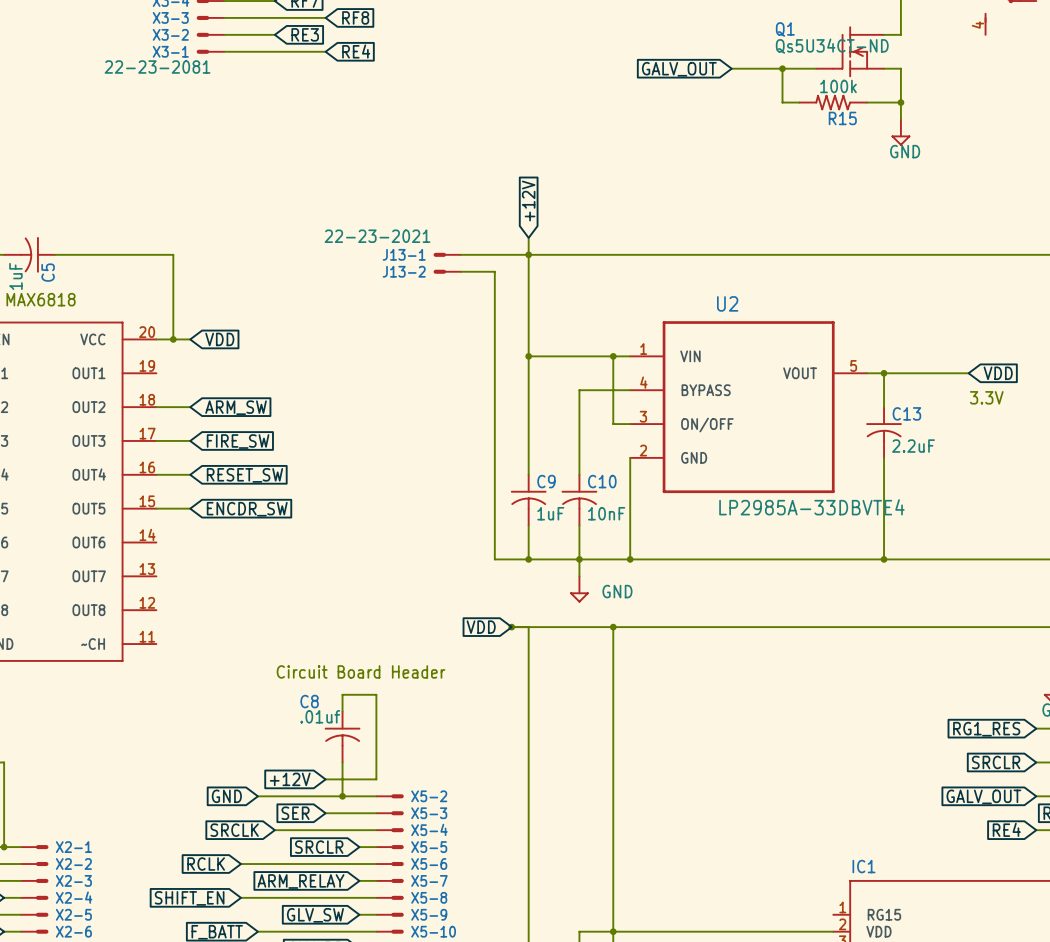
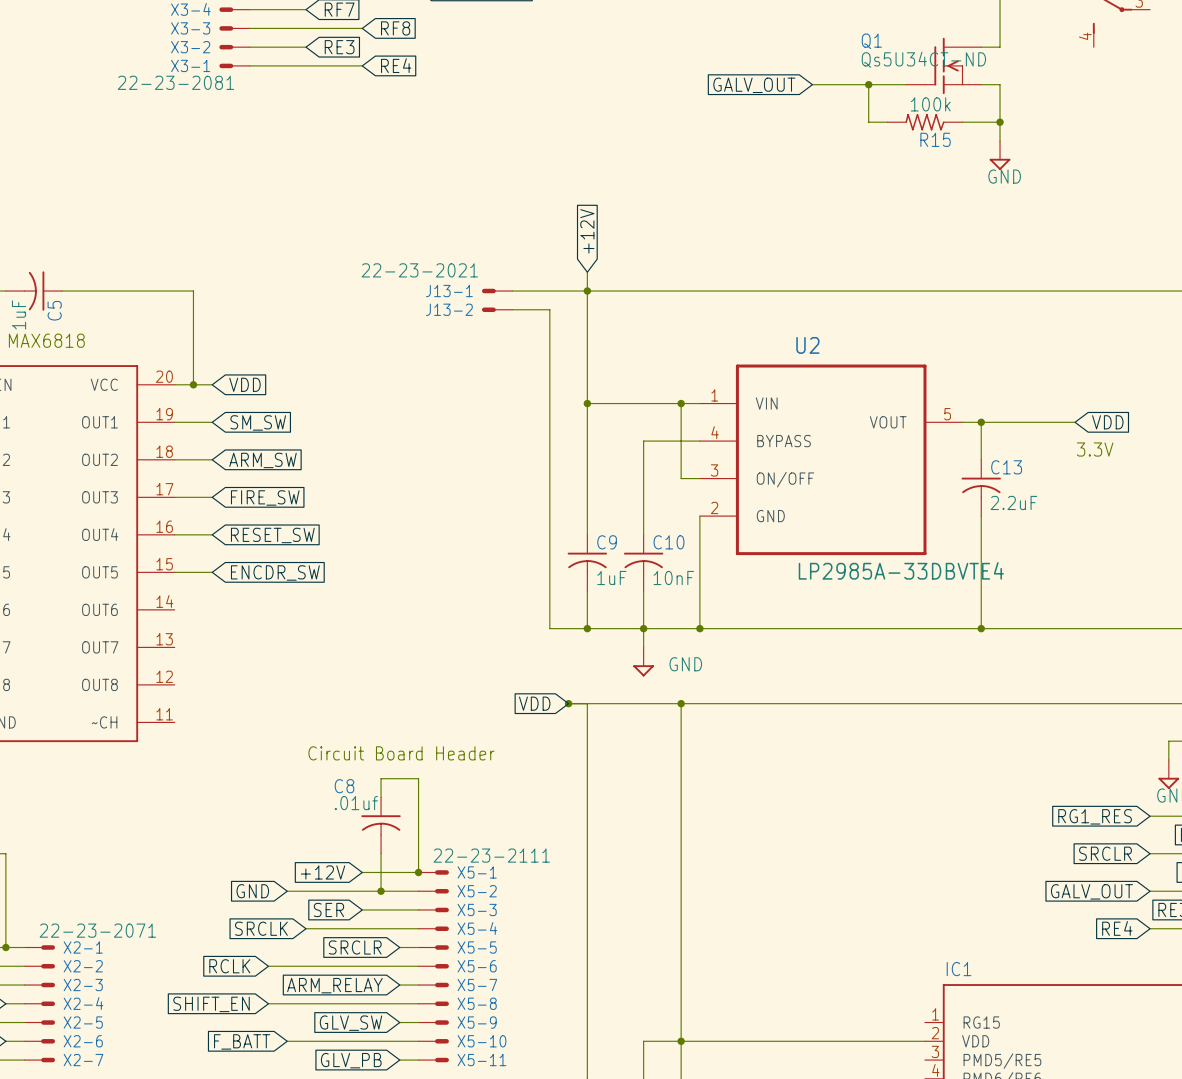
wire: none -> (174, 422) (212, 422)
global label: none -> SM_SW (258, 422)
junction: none -> (418, 872)
X5-1: none -> 22-23-2111 (433, 872)
X2-1 value: none -> 22-23-2071 (97, 930)

